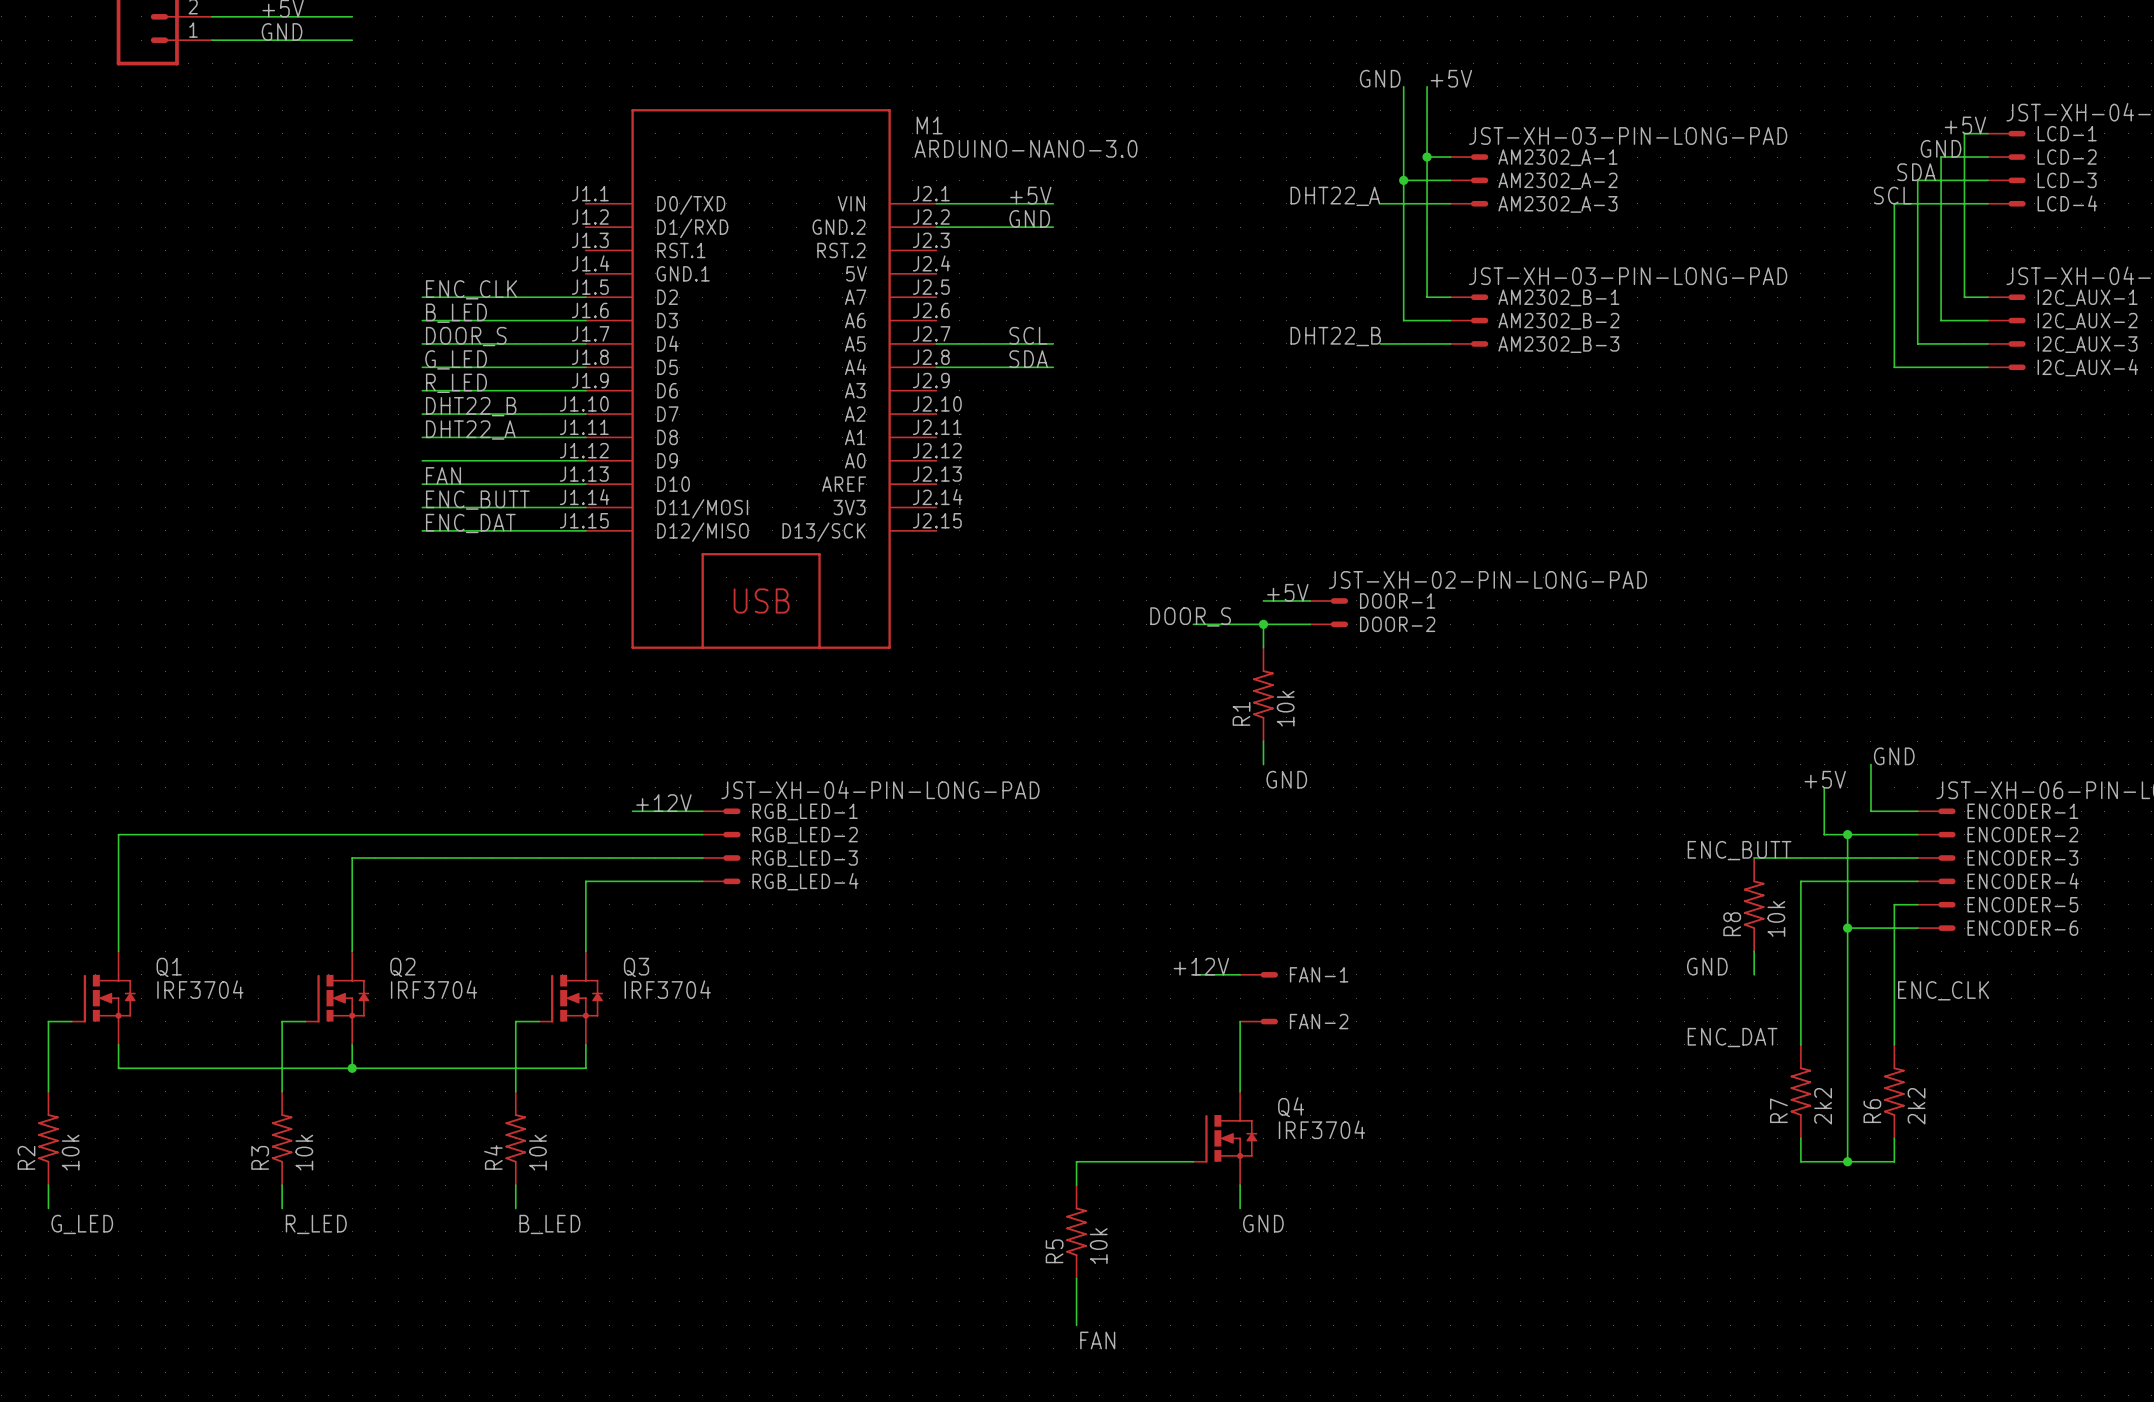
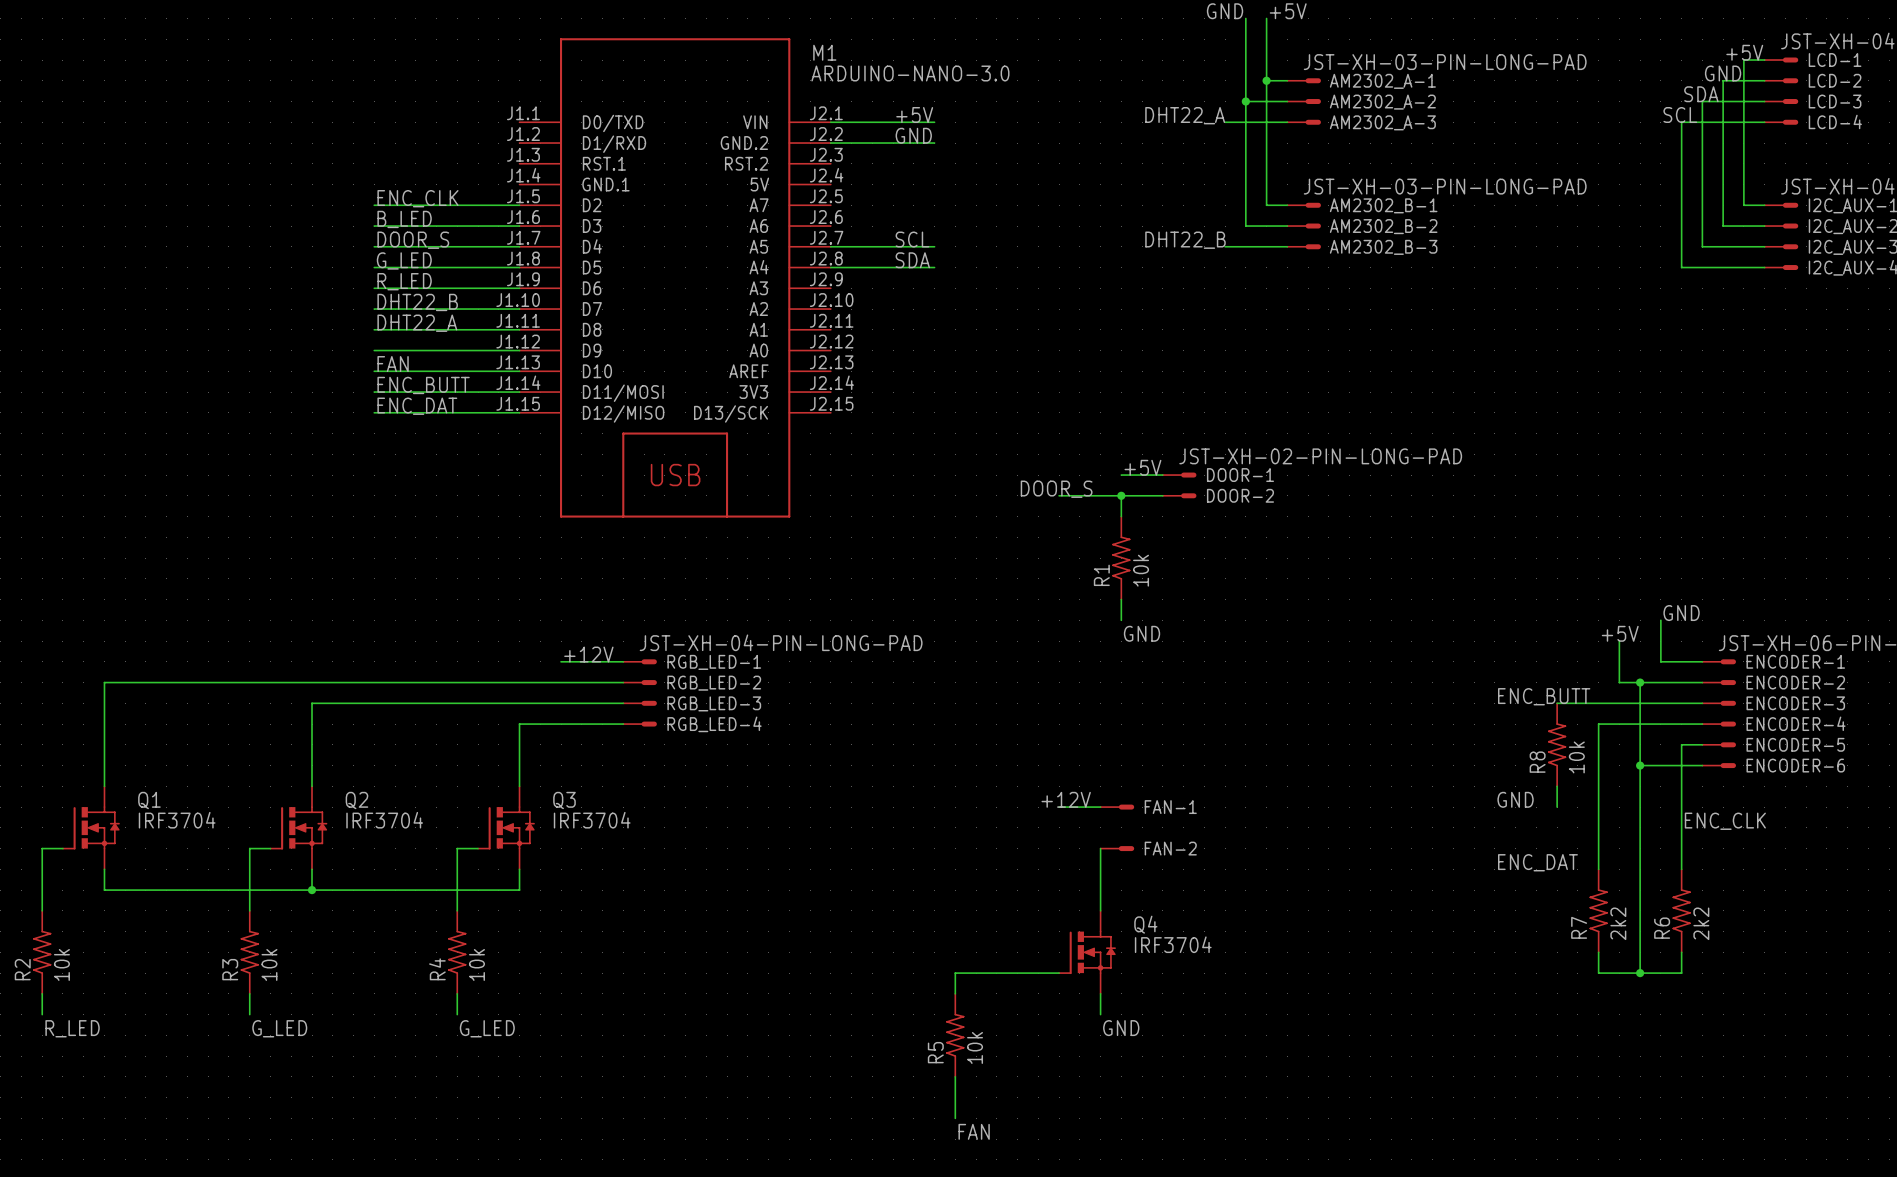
label: G_LED (82, 1224) -> R_LED (72, 1028)
label: R_LED (316, 1224) -> G_LED (279, 1028)
label: B_LED (549, 1224) -> G_LED (487, 1028)

